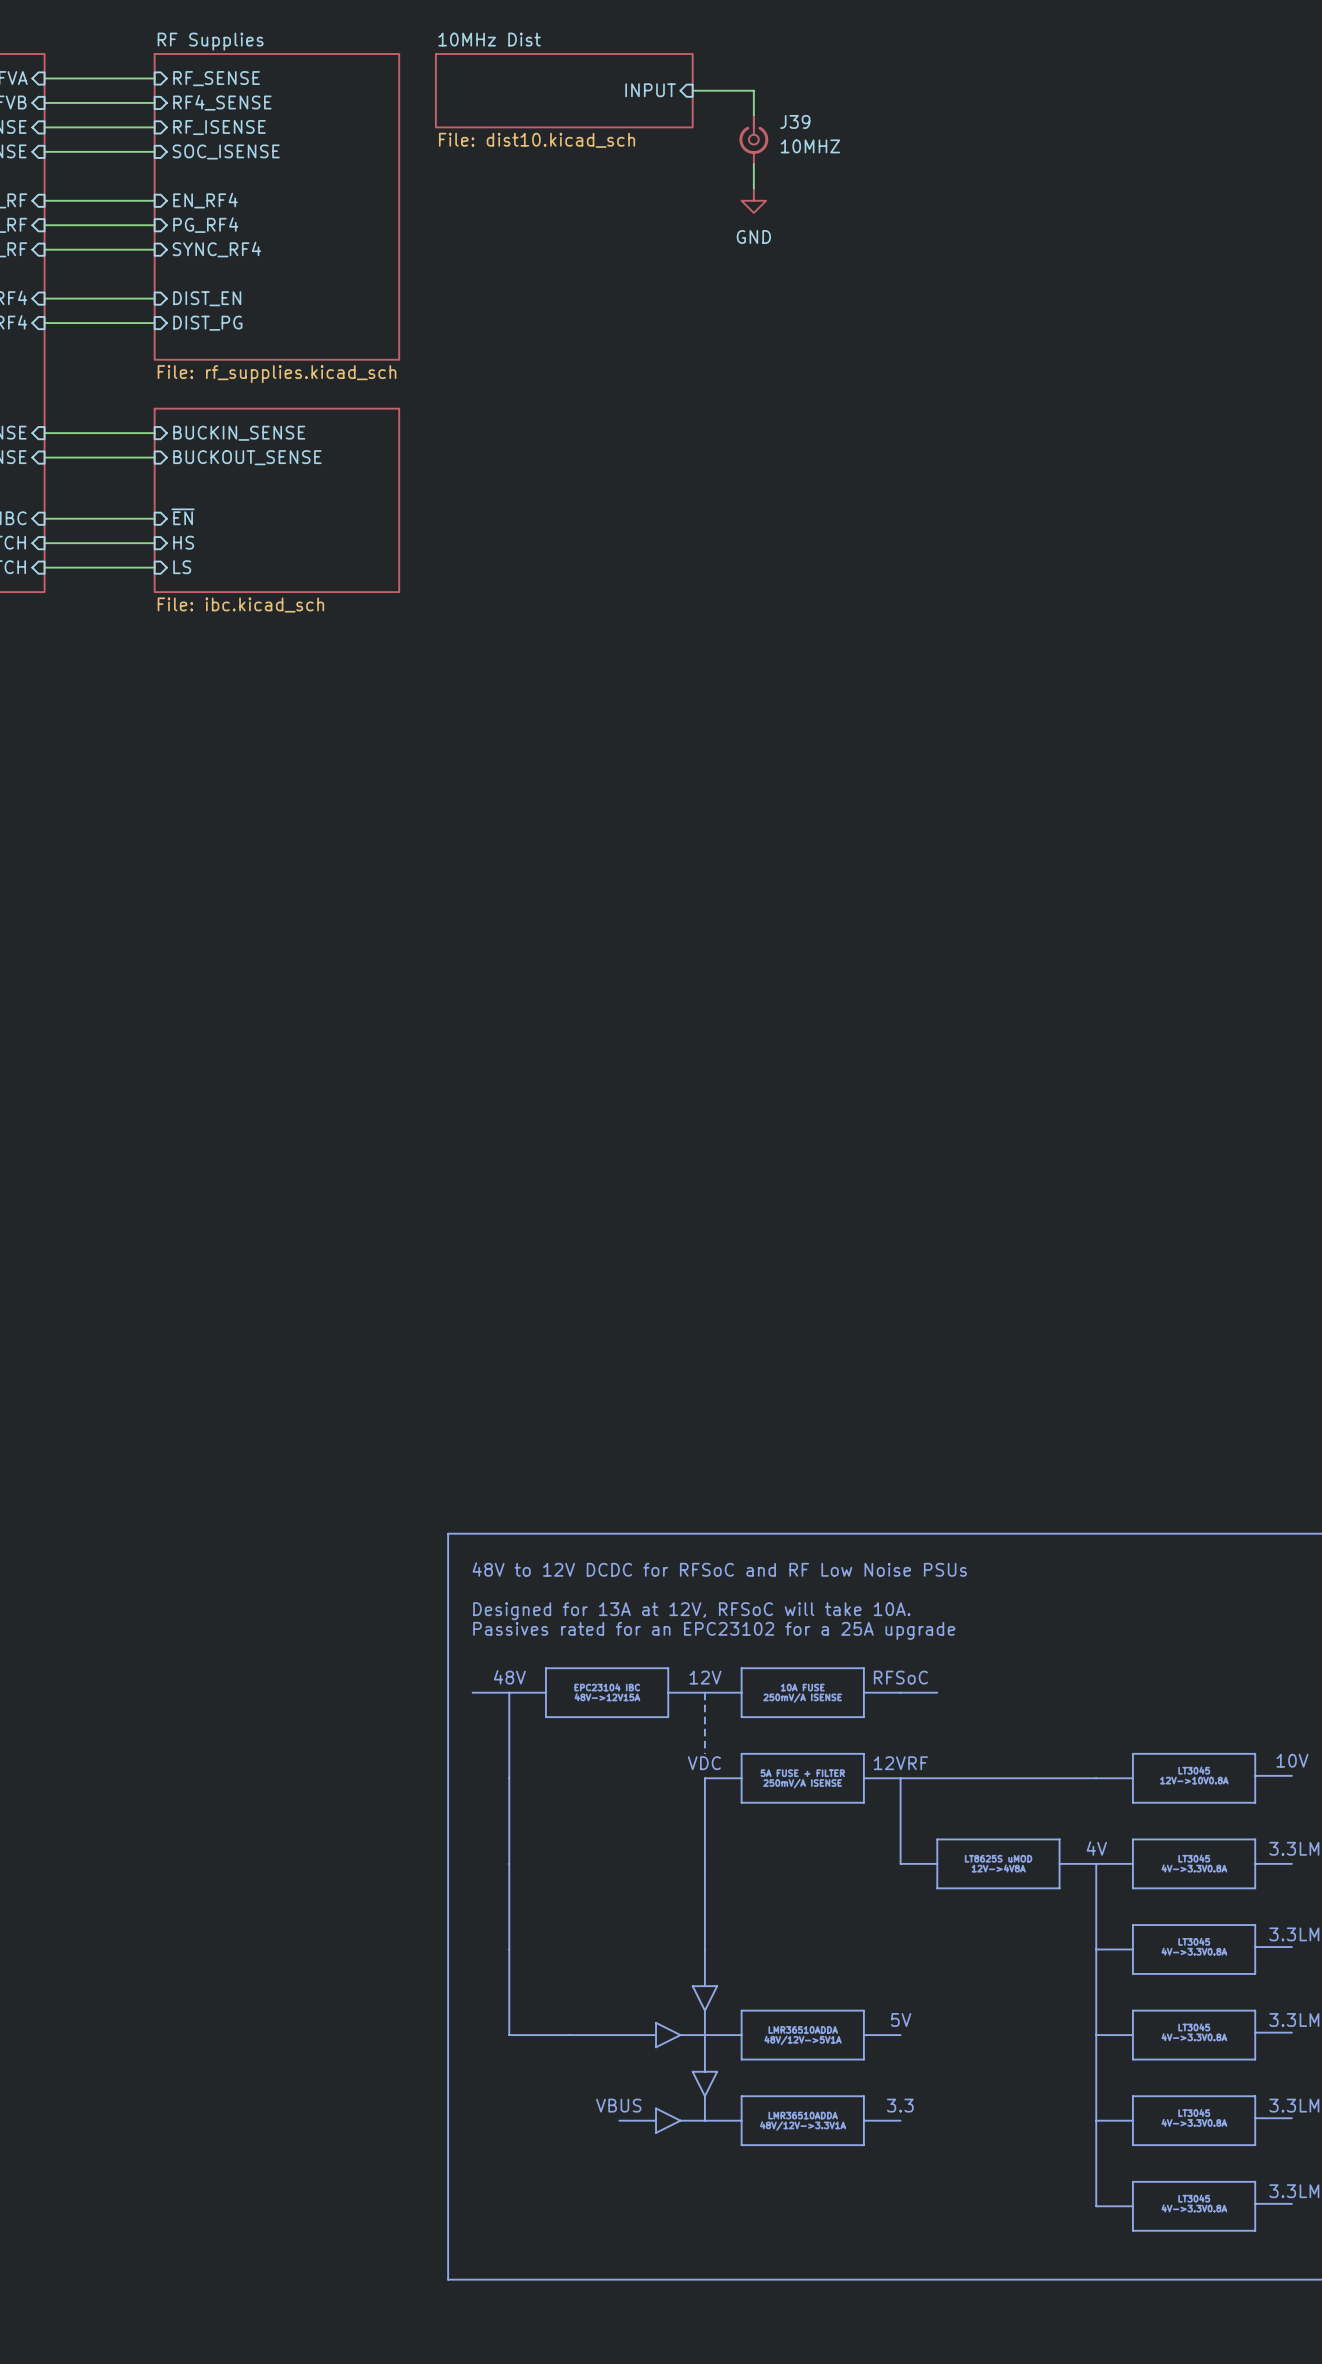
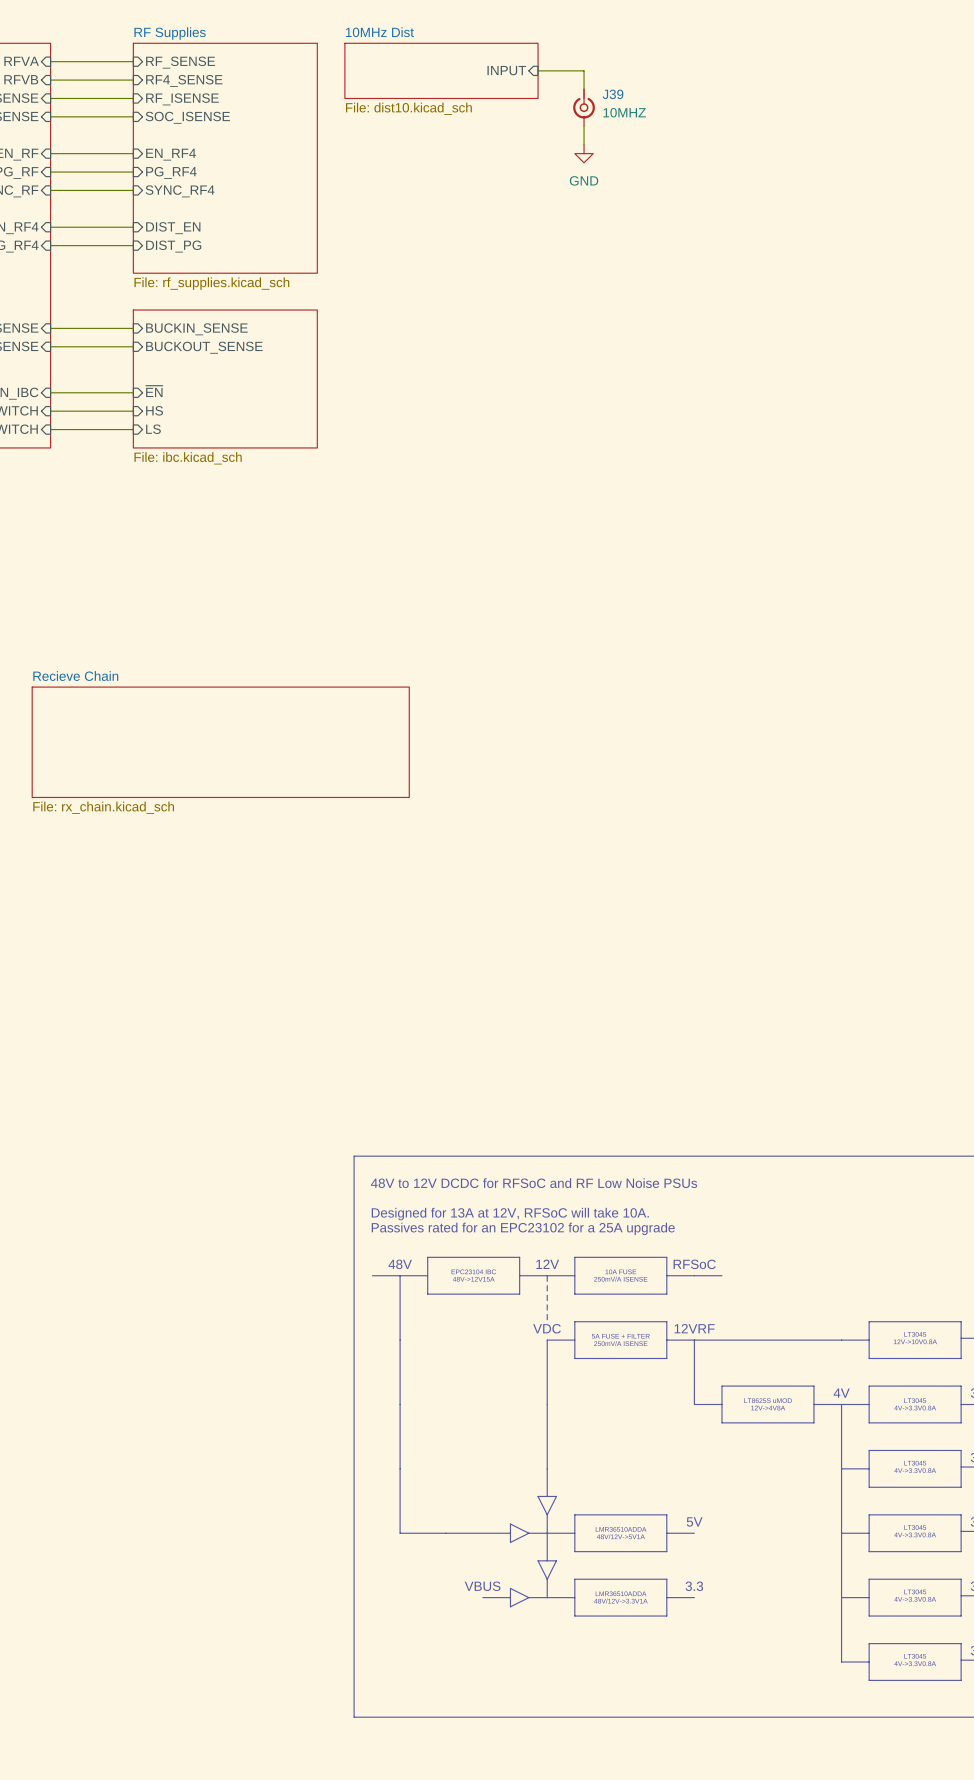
sheet Recieve Chain: none -> File: rx_chain.kicad_sch (220, 742)

